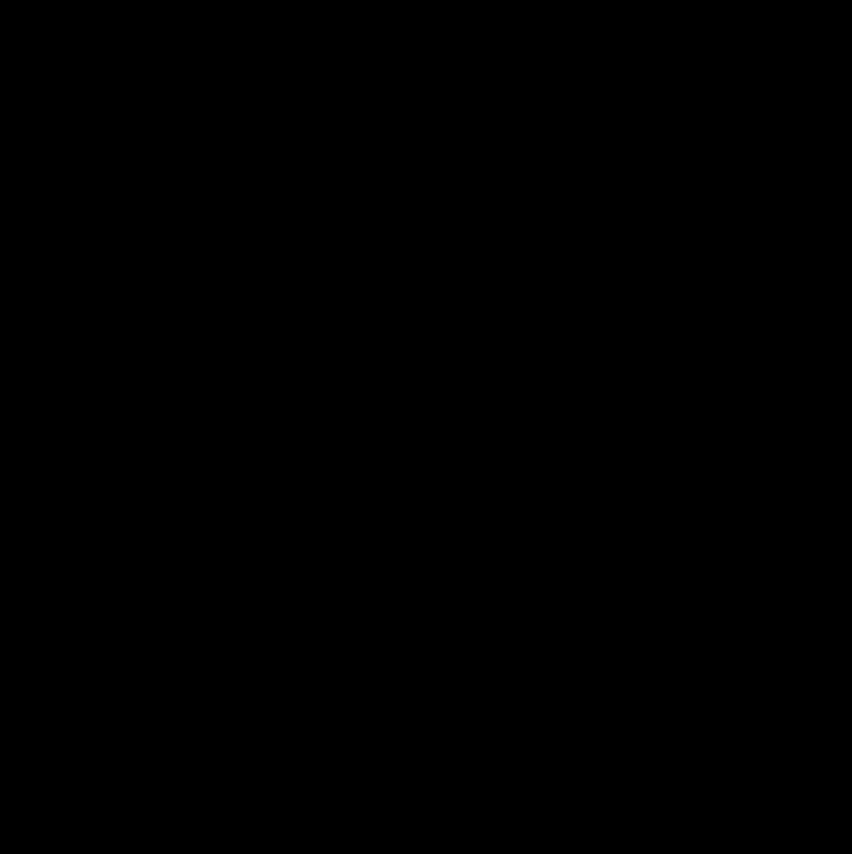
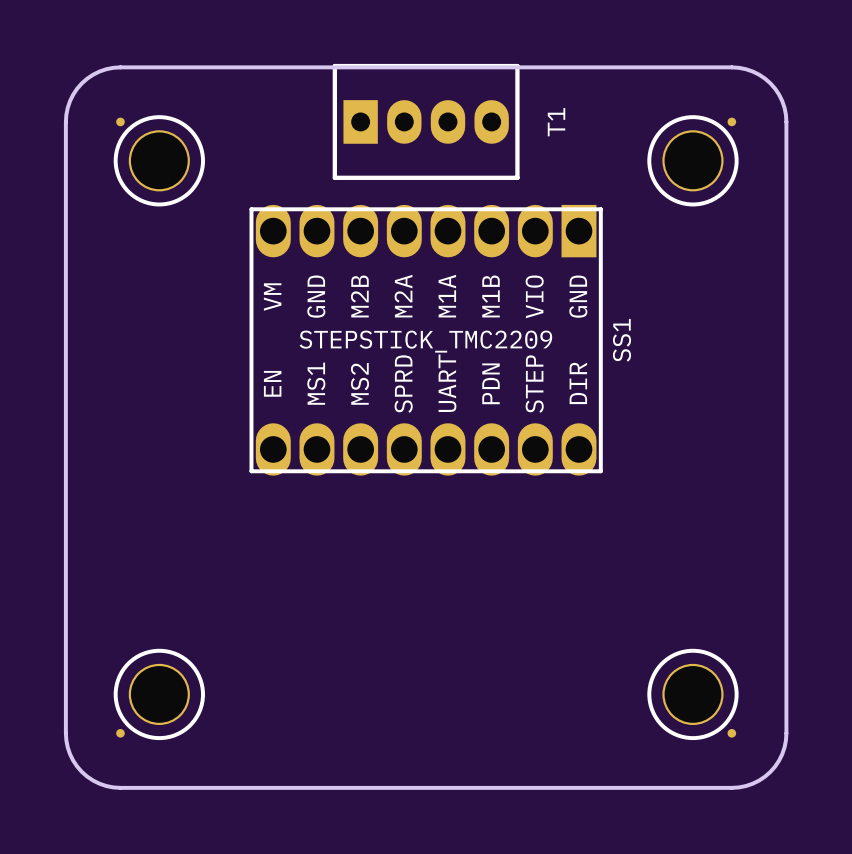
board edge: none -> (65, 121) (70, 101) (81, 83) (99, 71) (120, 67) (731, 67) (745, 69) (765, 78) (775, 88) (782, 101) (786, 121) (786, 733)
board edge: none -> (65, 121) (65, 733) (70, 754) (77, 766) (87, 776) (106, 786) (120, 787) (731, 787) (752, 783) (770, 771) (782, 754) (786, 733)
part: none -> (120, 121)
T1: none -> (426, 121)
part: none -> (731, 121)
part: none -> (159, 160)
part: none -> (692, 160)
SS1: none -> STEPSTICK_TMC2209 (426, 340)
part: none -> (159, 694)
part: none -> (692, 694)
part: none -> (120, 733)
part: none -> (731, 733)

